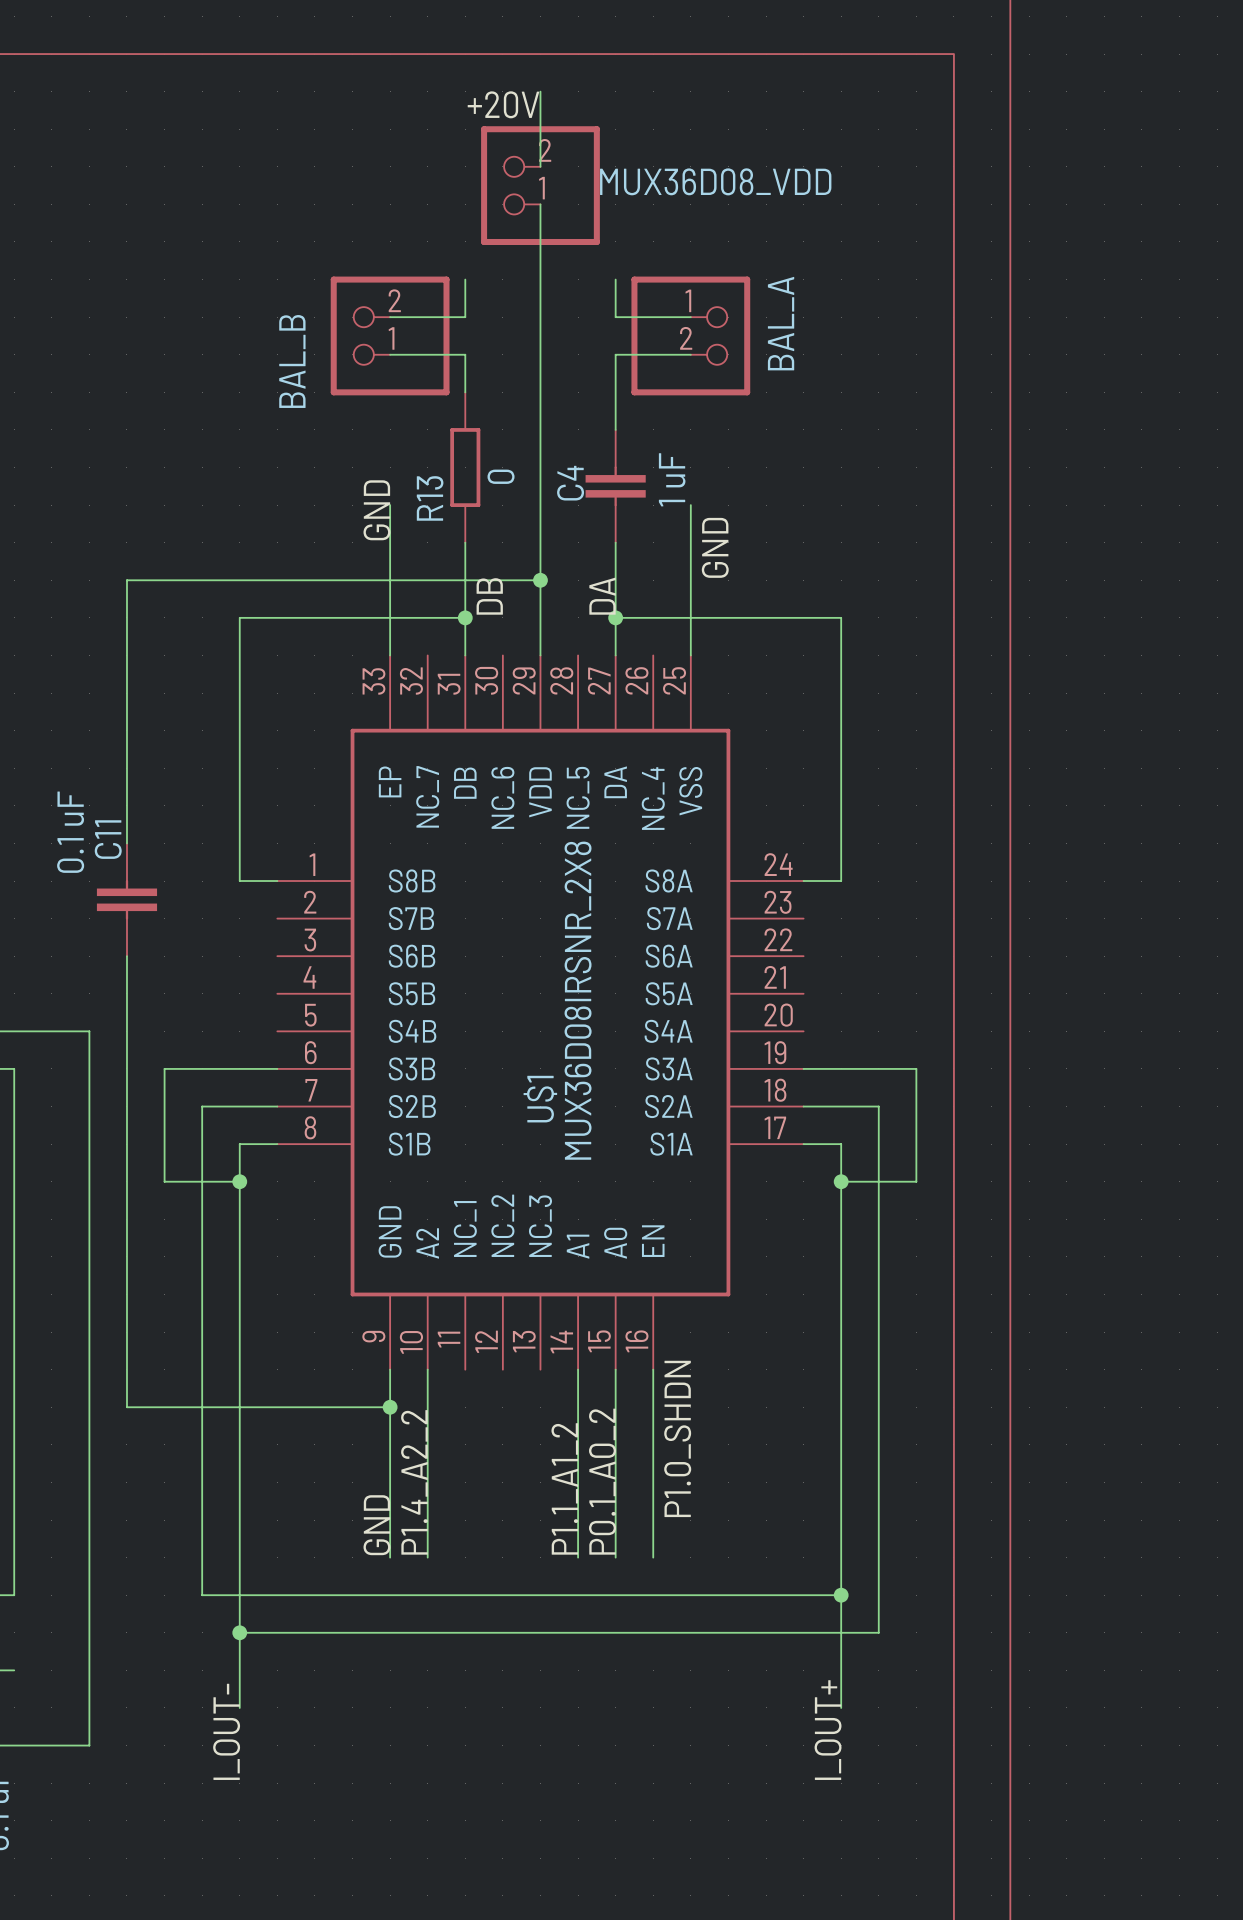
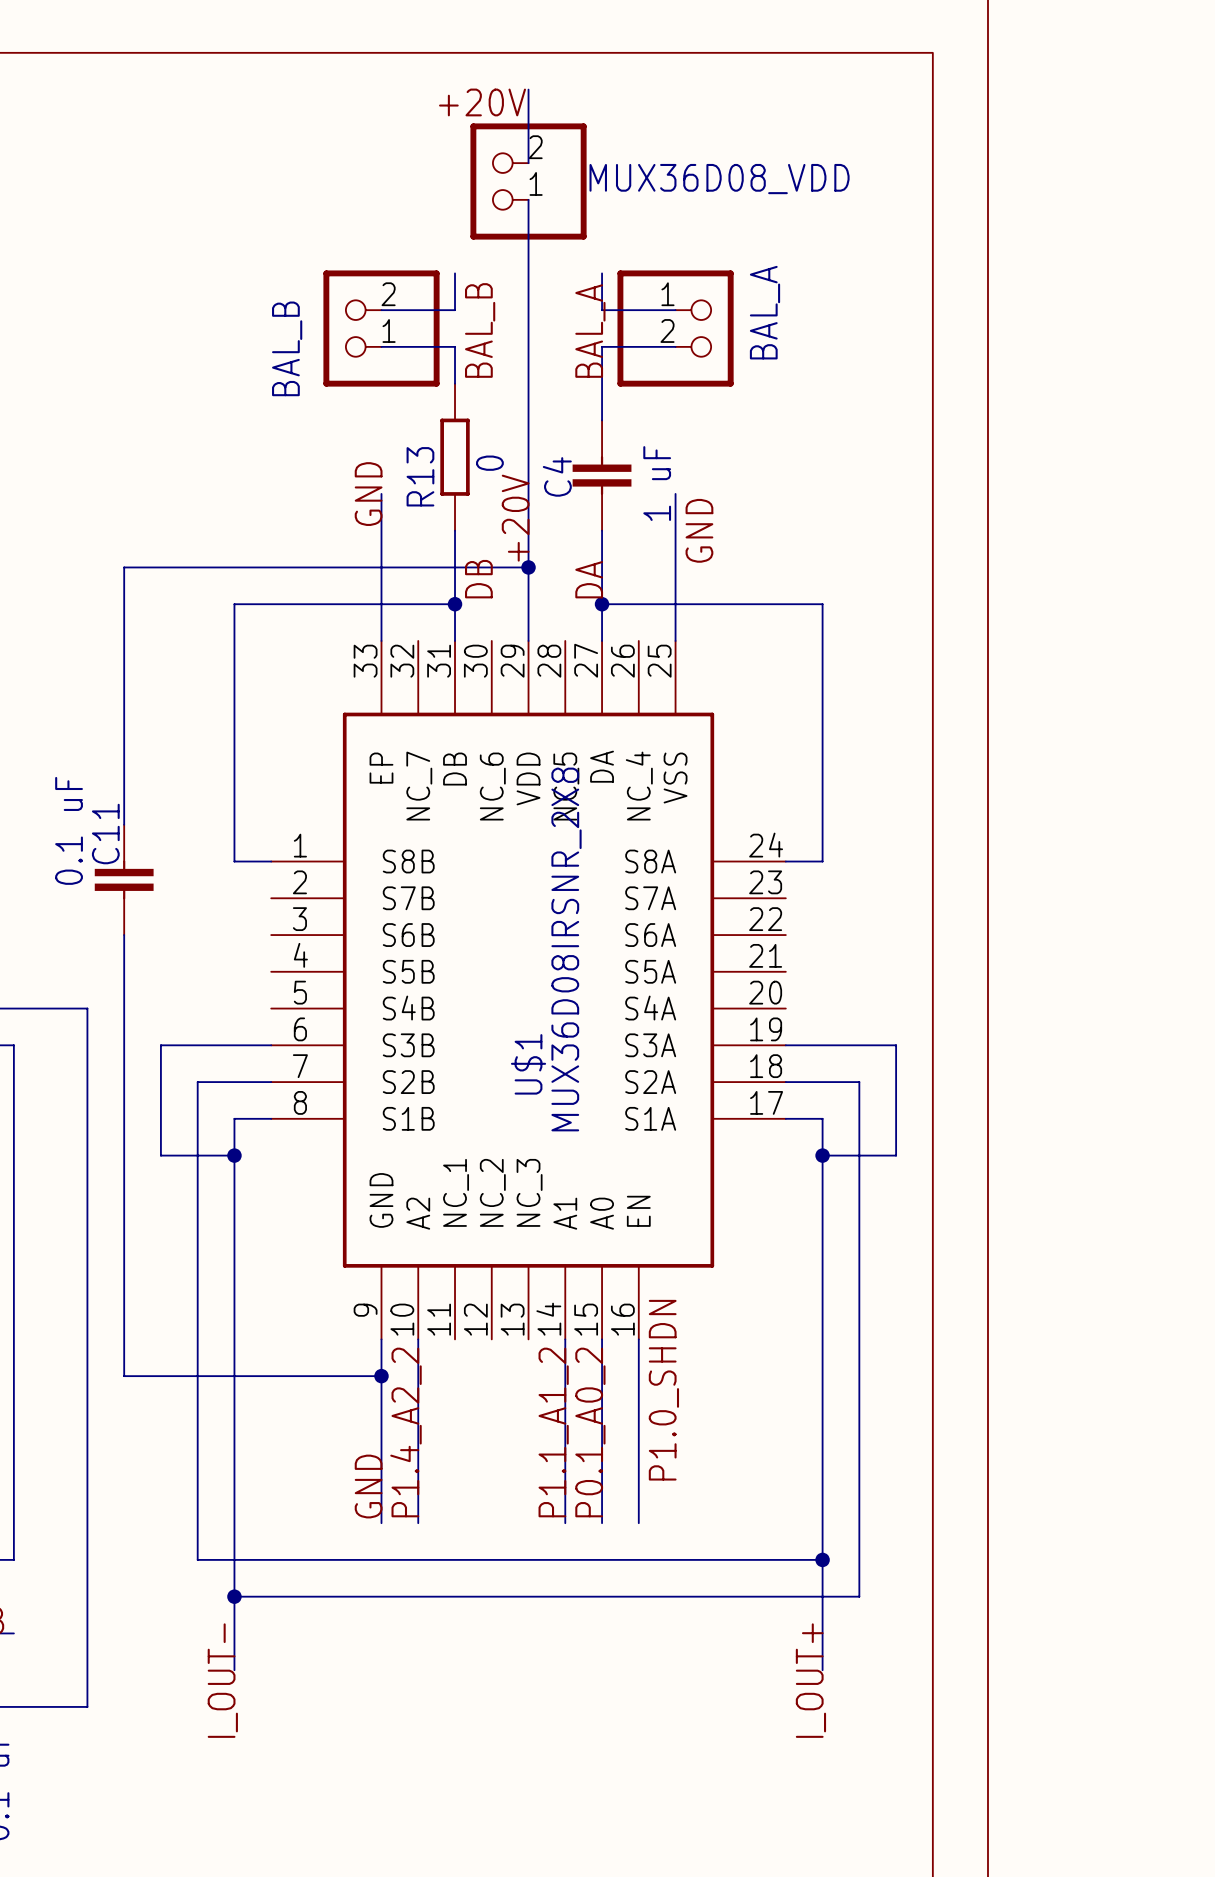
label: none -> BAL_B (480, 330)
label: none -> BAL_A (590, 331)
label: none -> +20V (515, 518)

